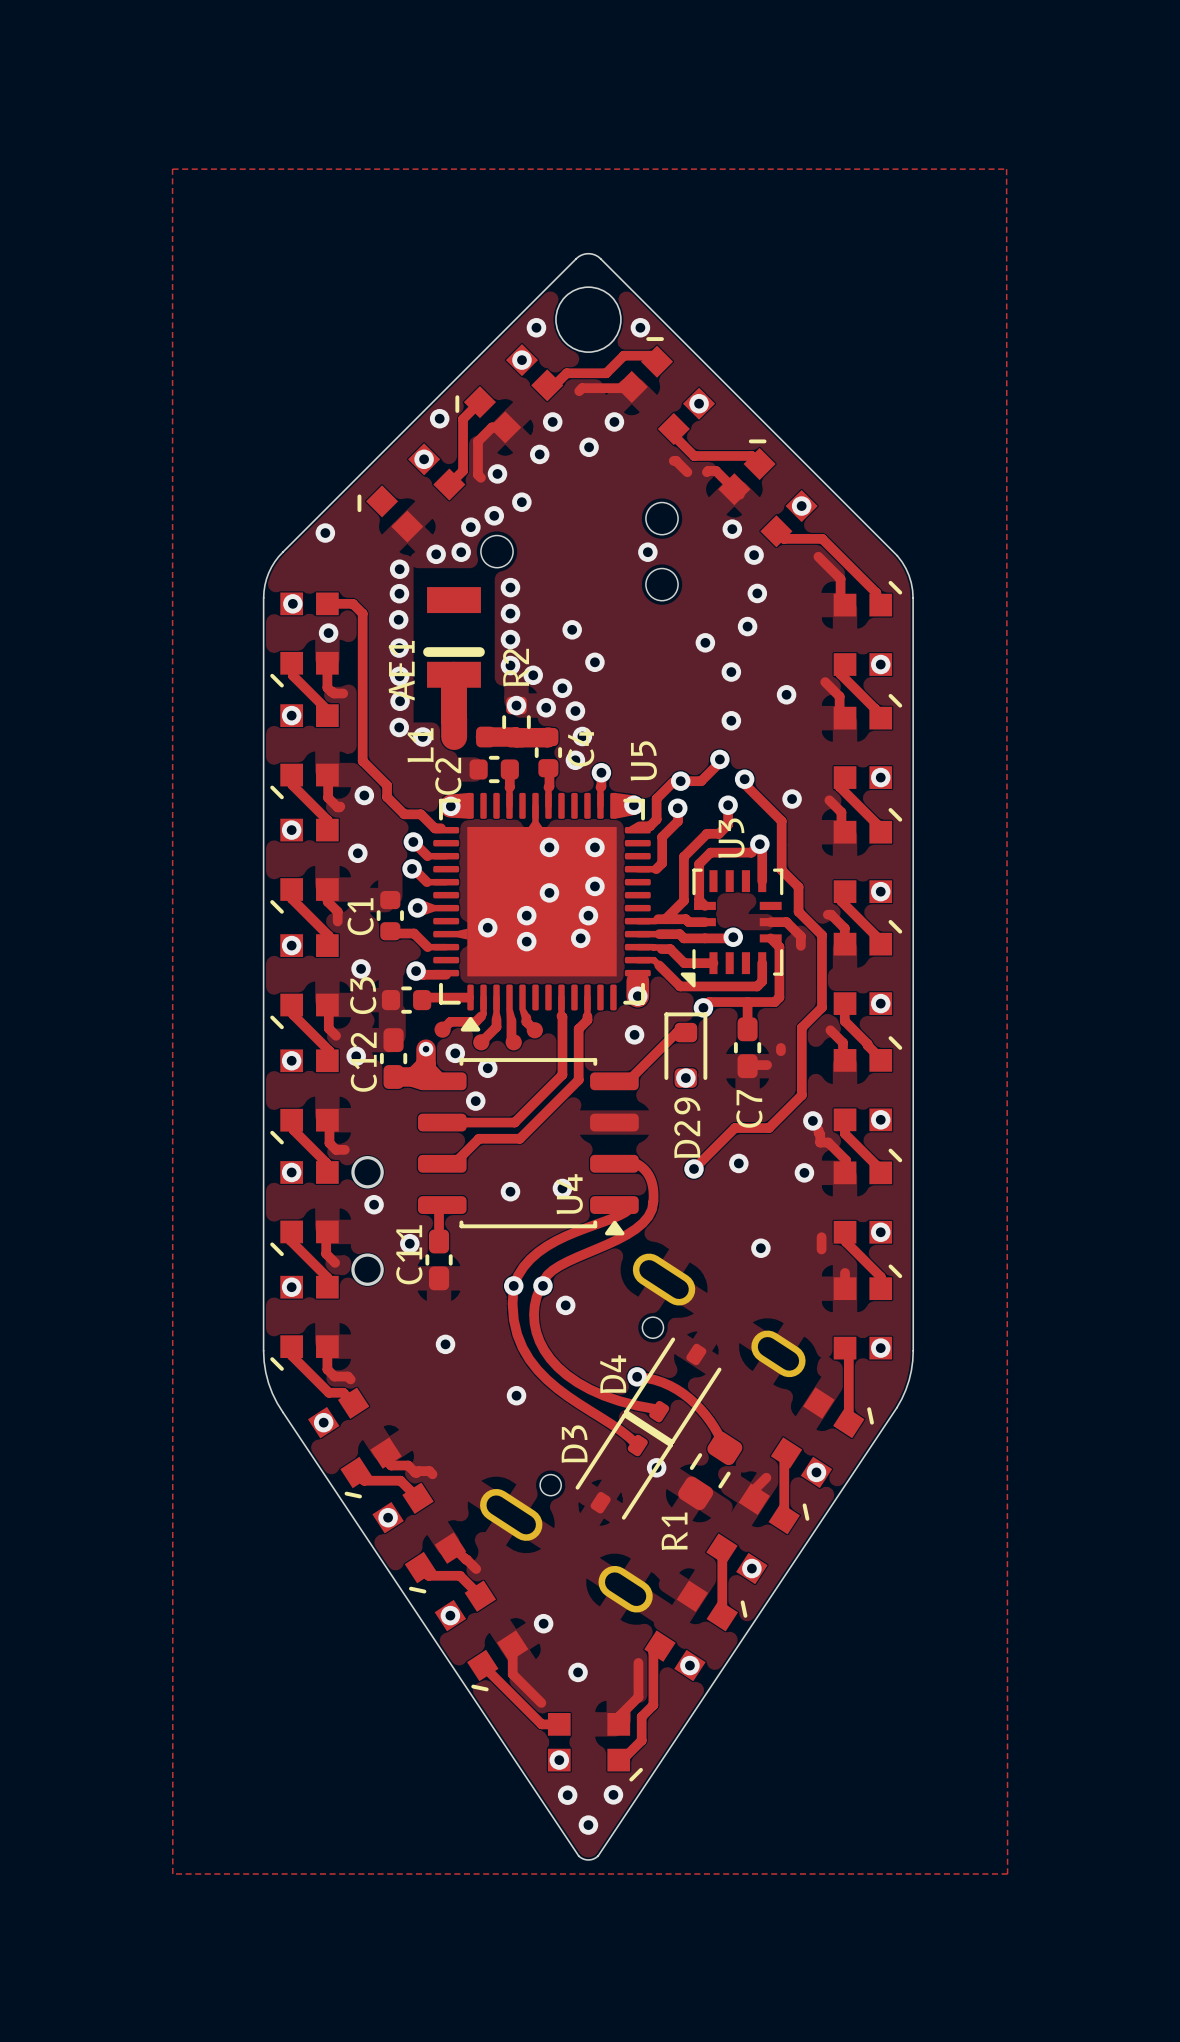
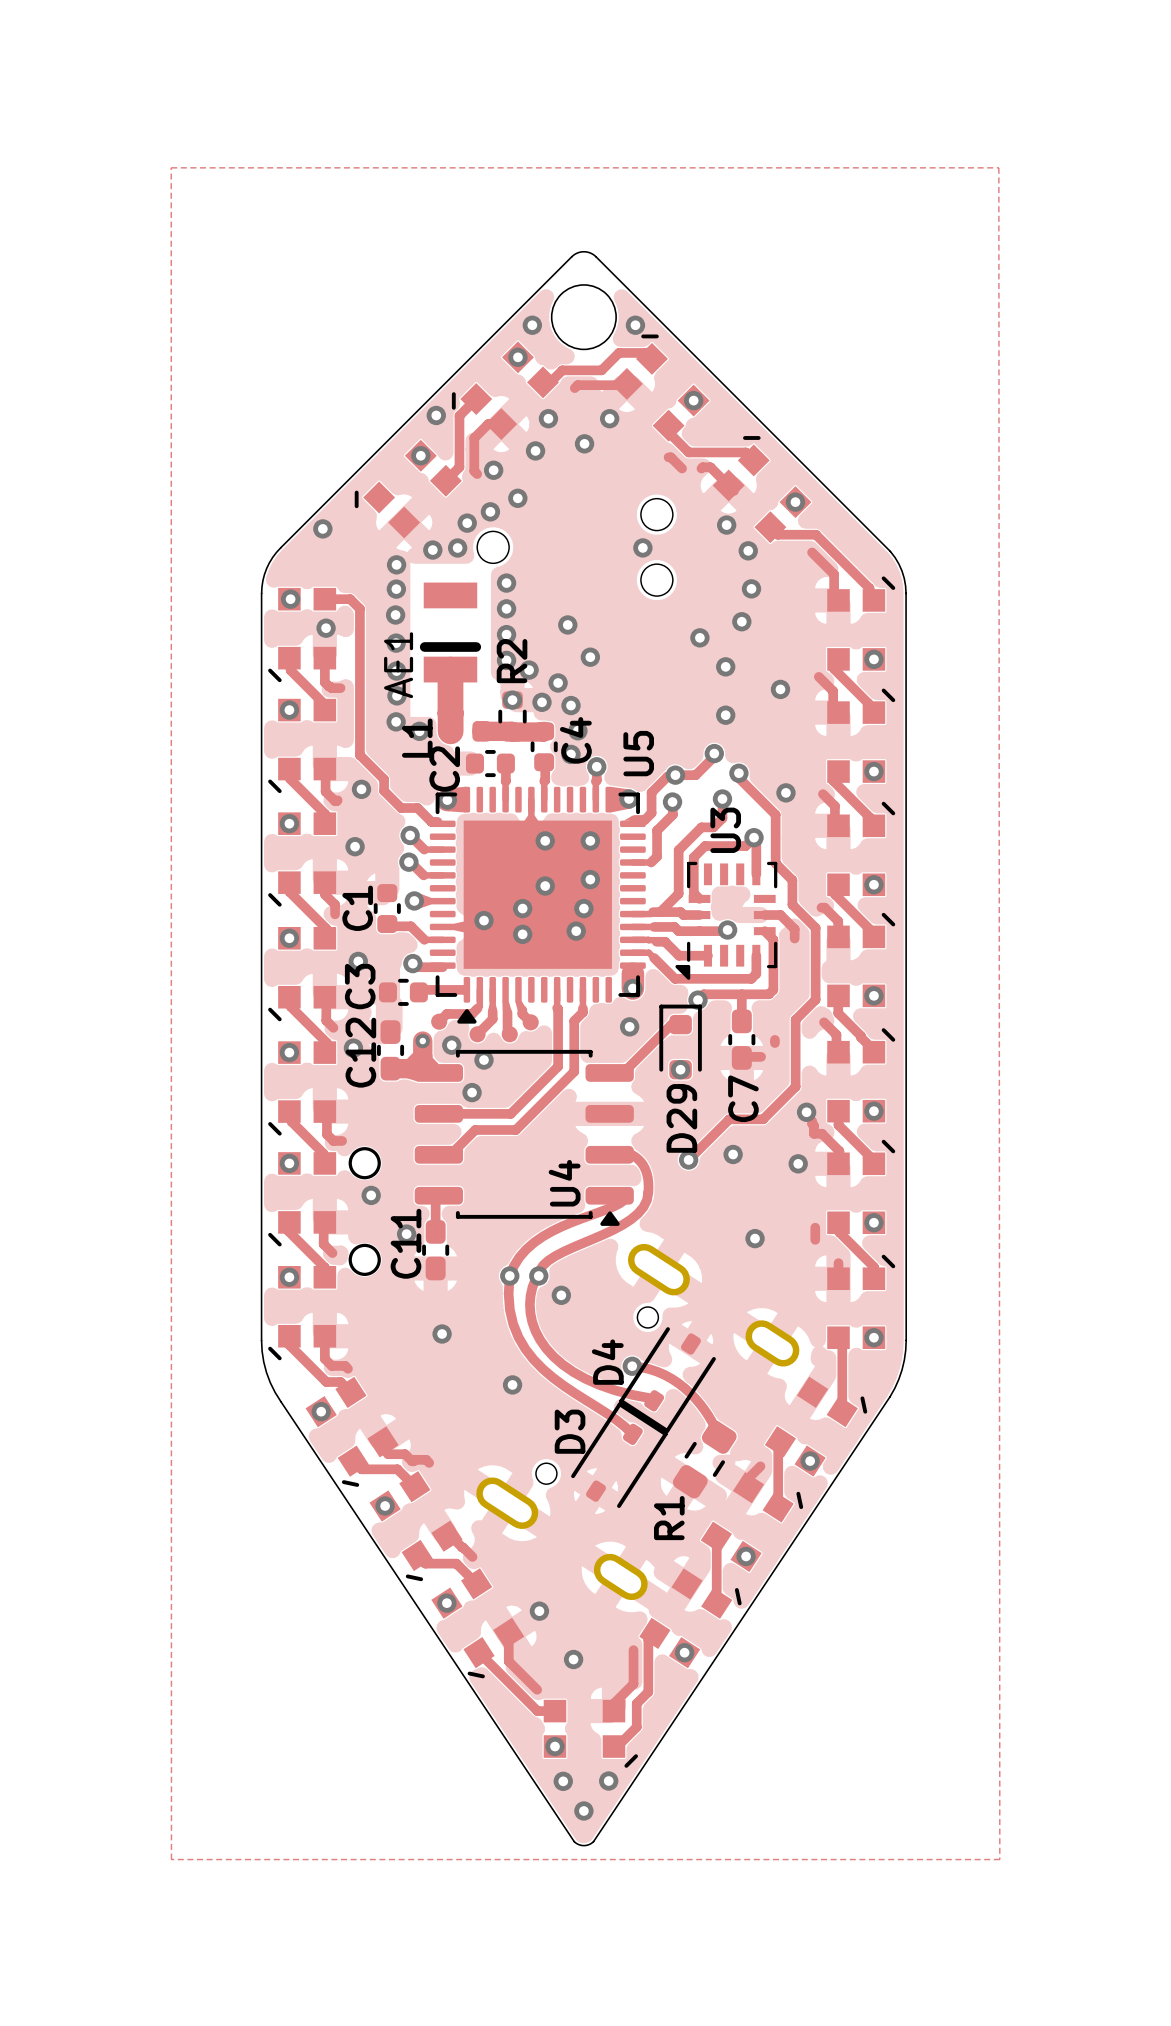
via: (562, 1188) -> none
via: (510, 1191) -> none
via: (656, 1467) -> none

